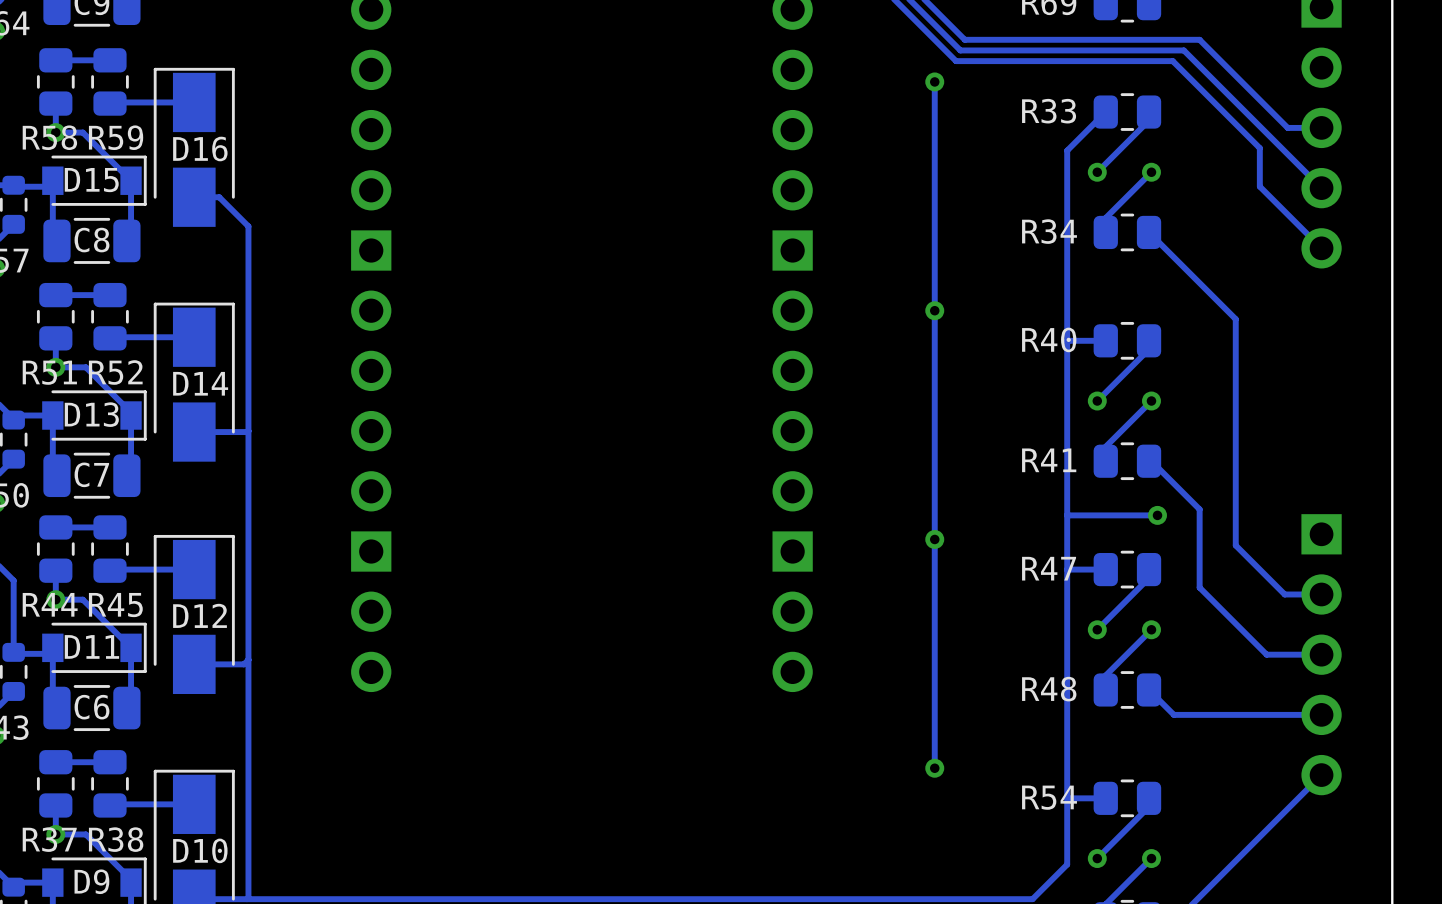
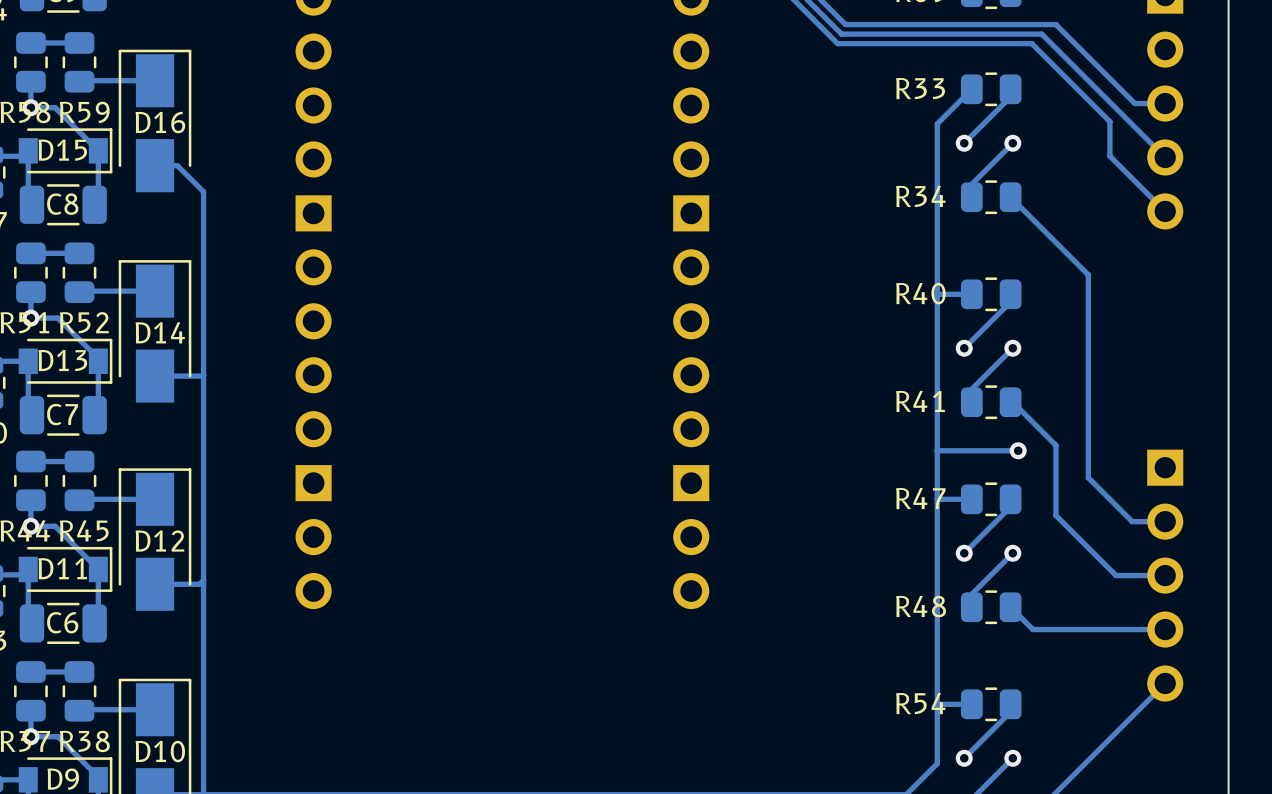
track: (934, 81) (934, 768) -> none
via: (934, 81) -> none
via: (934, 310) -> none
via: (934, 539) -> none
via: (934, 768) -> none

